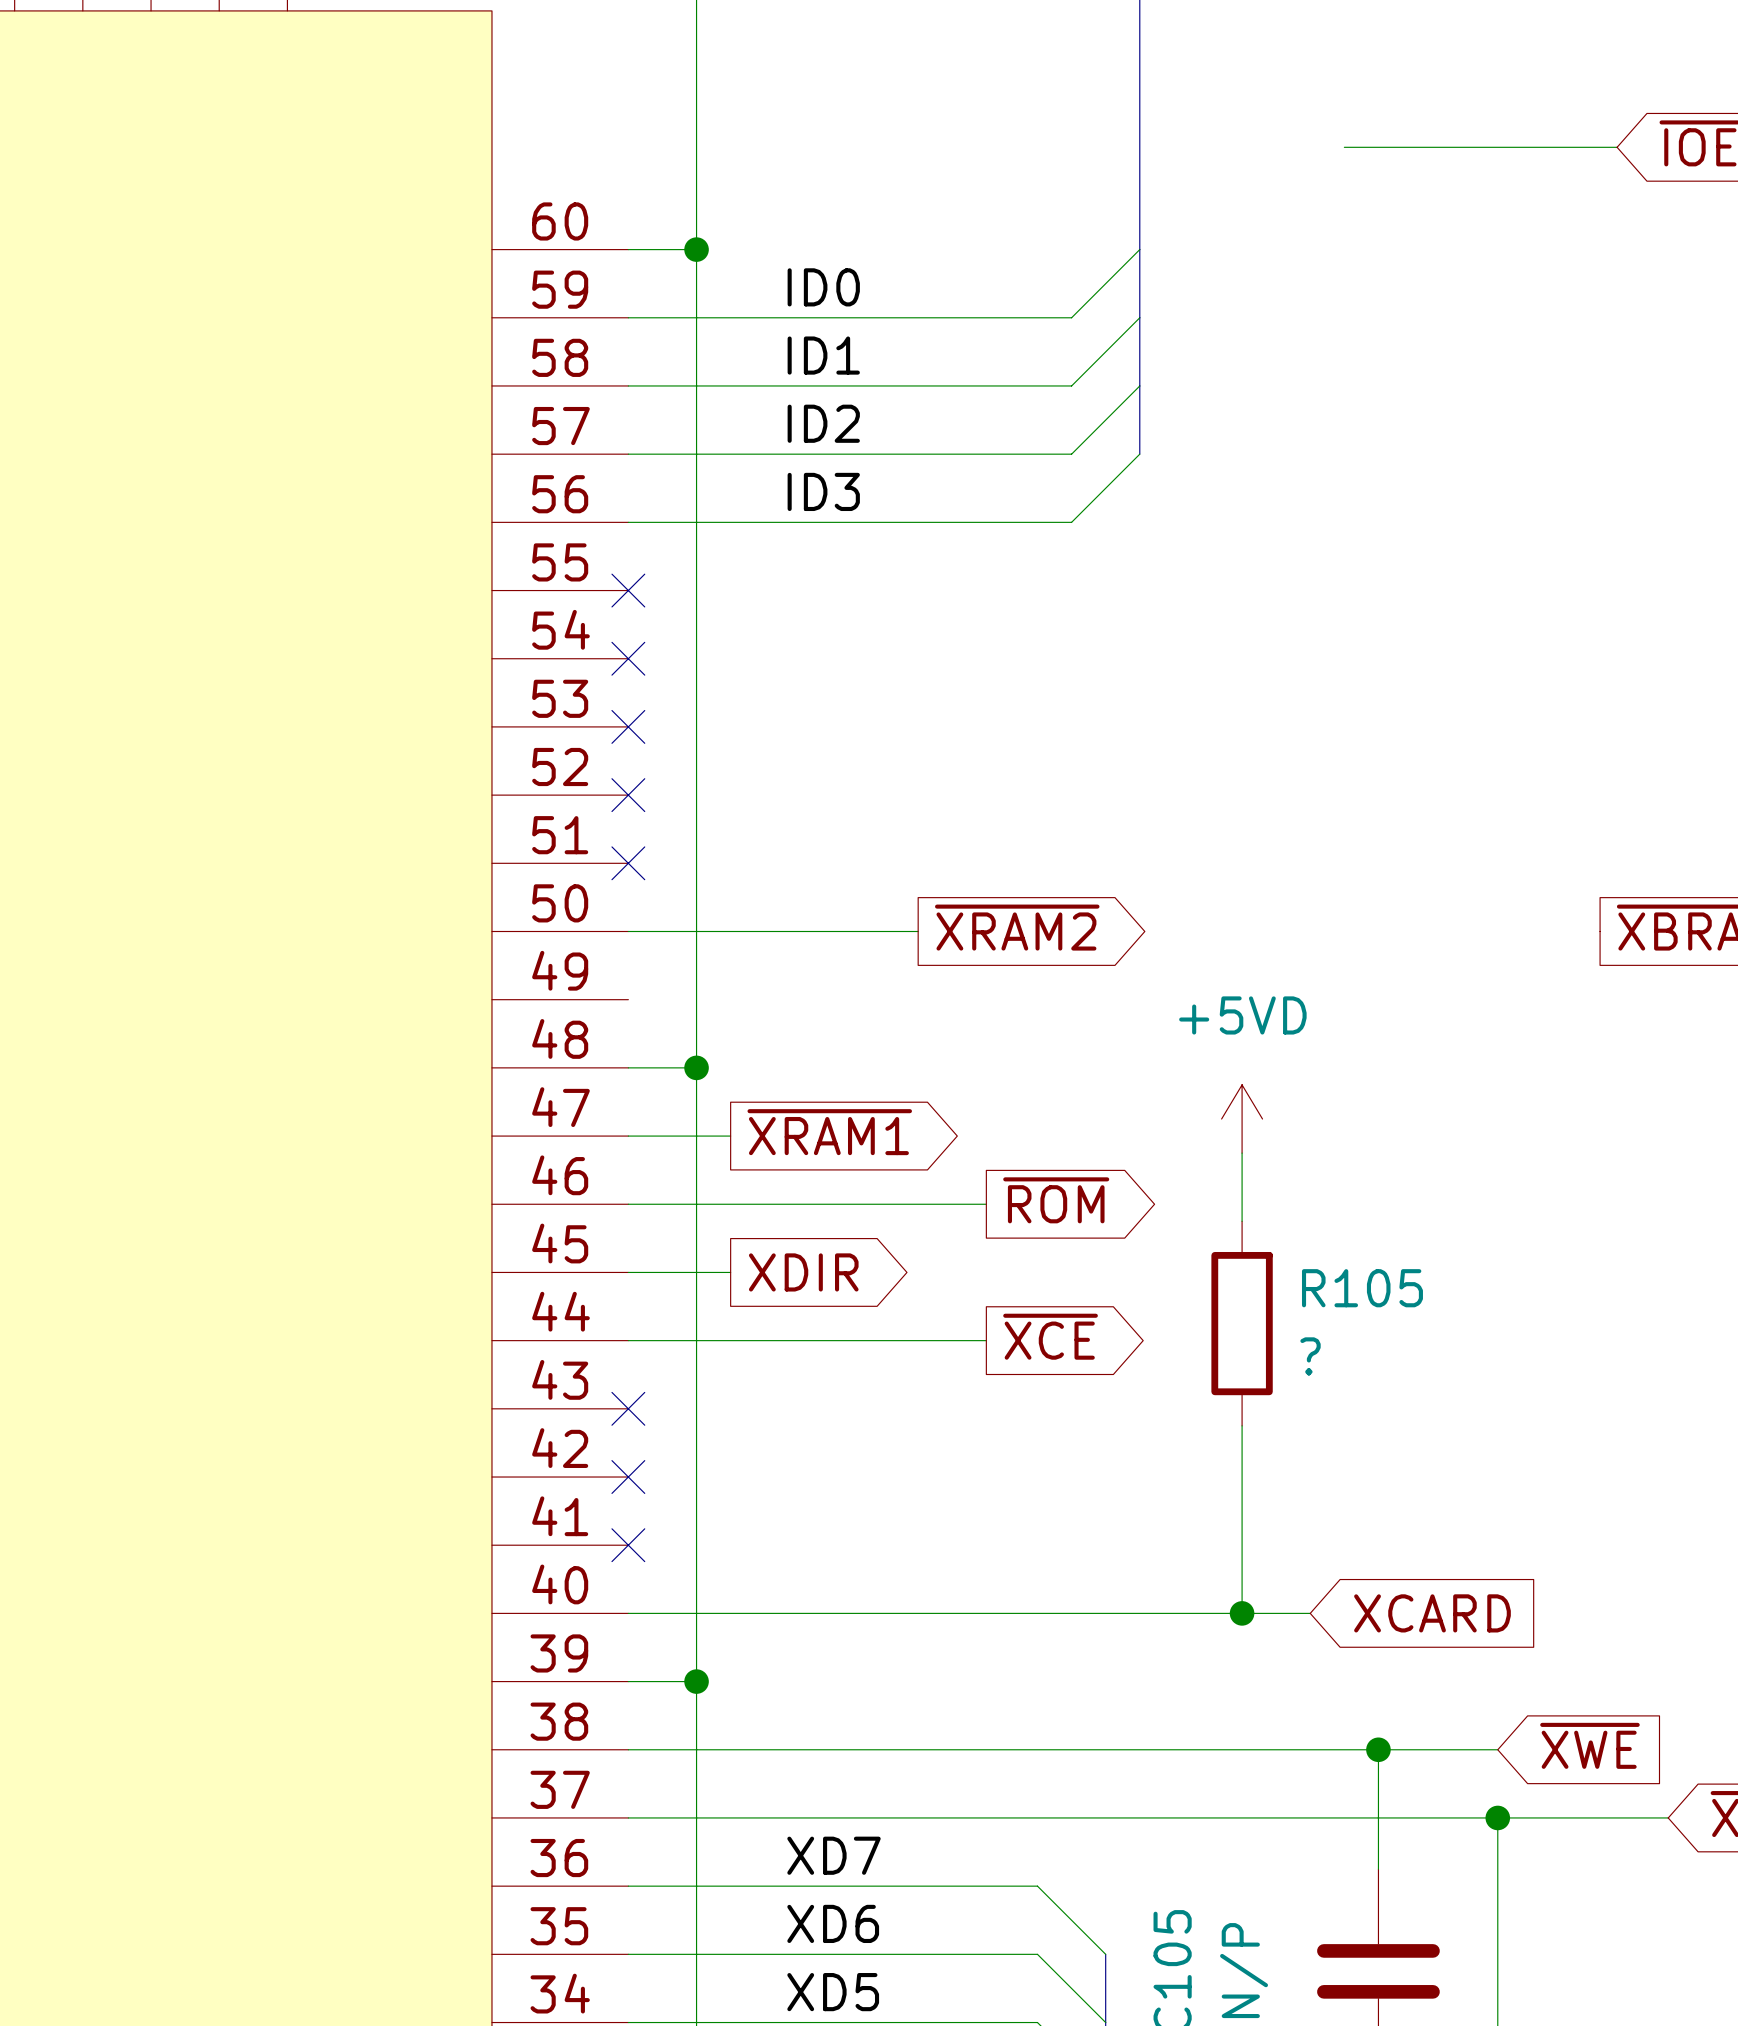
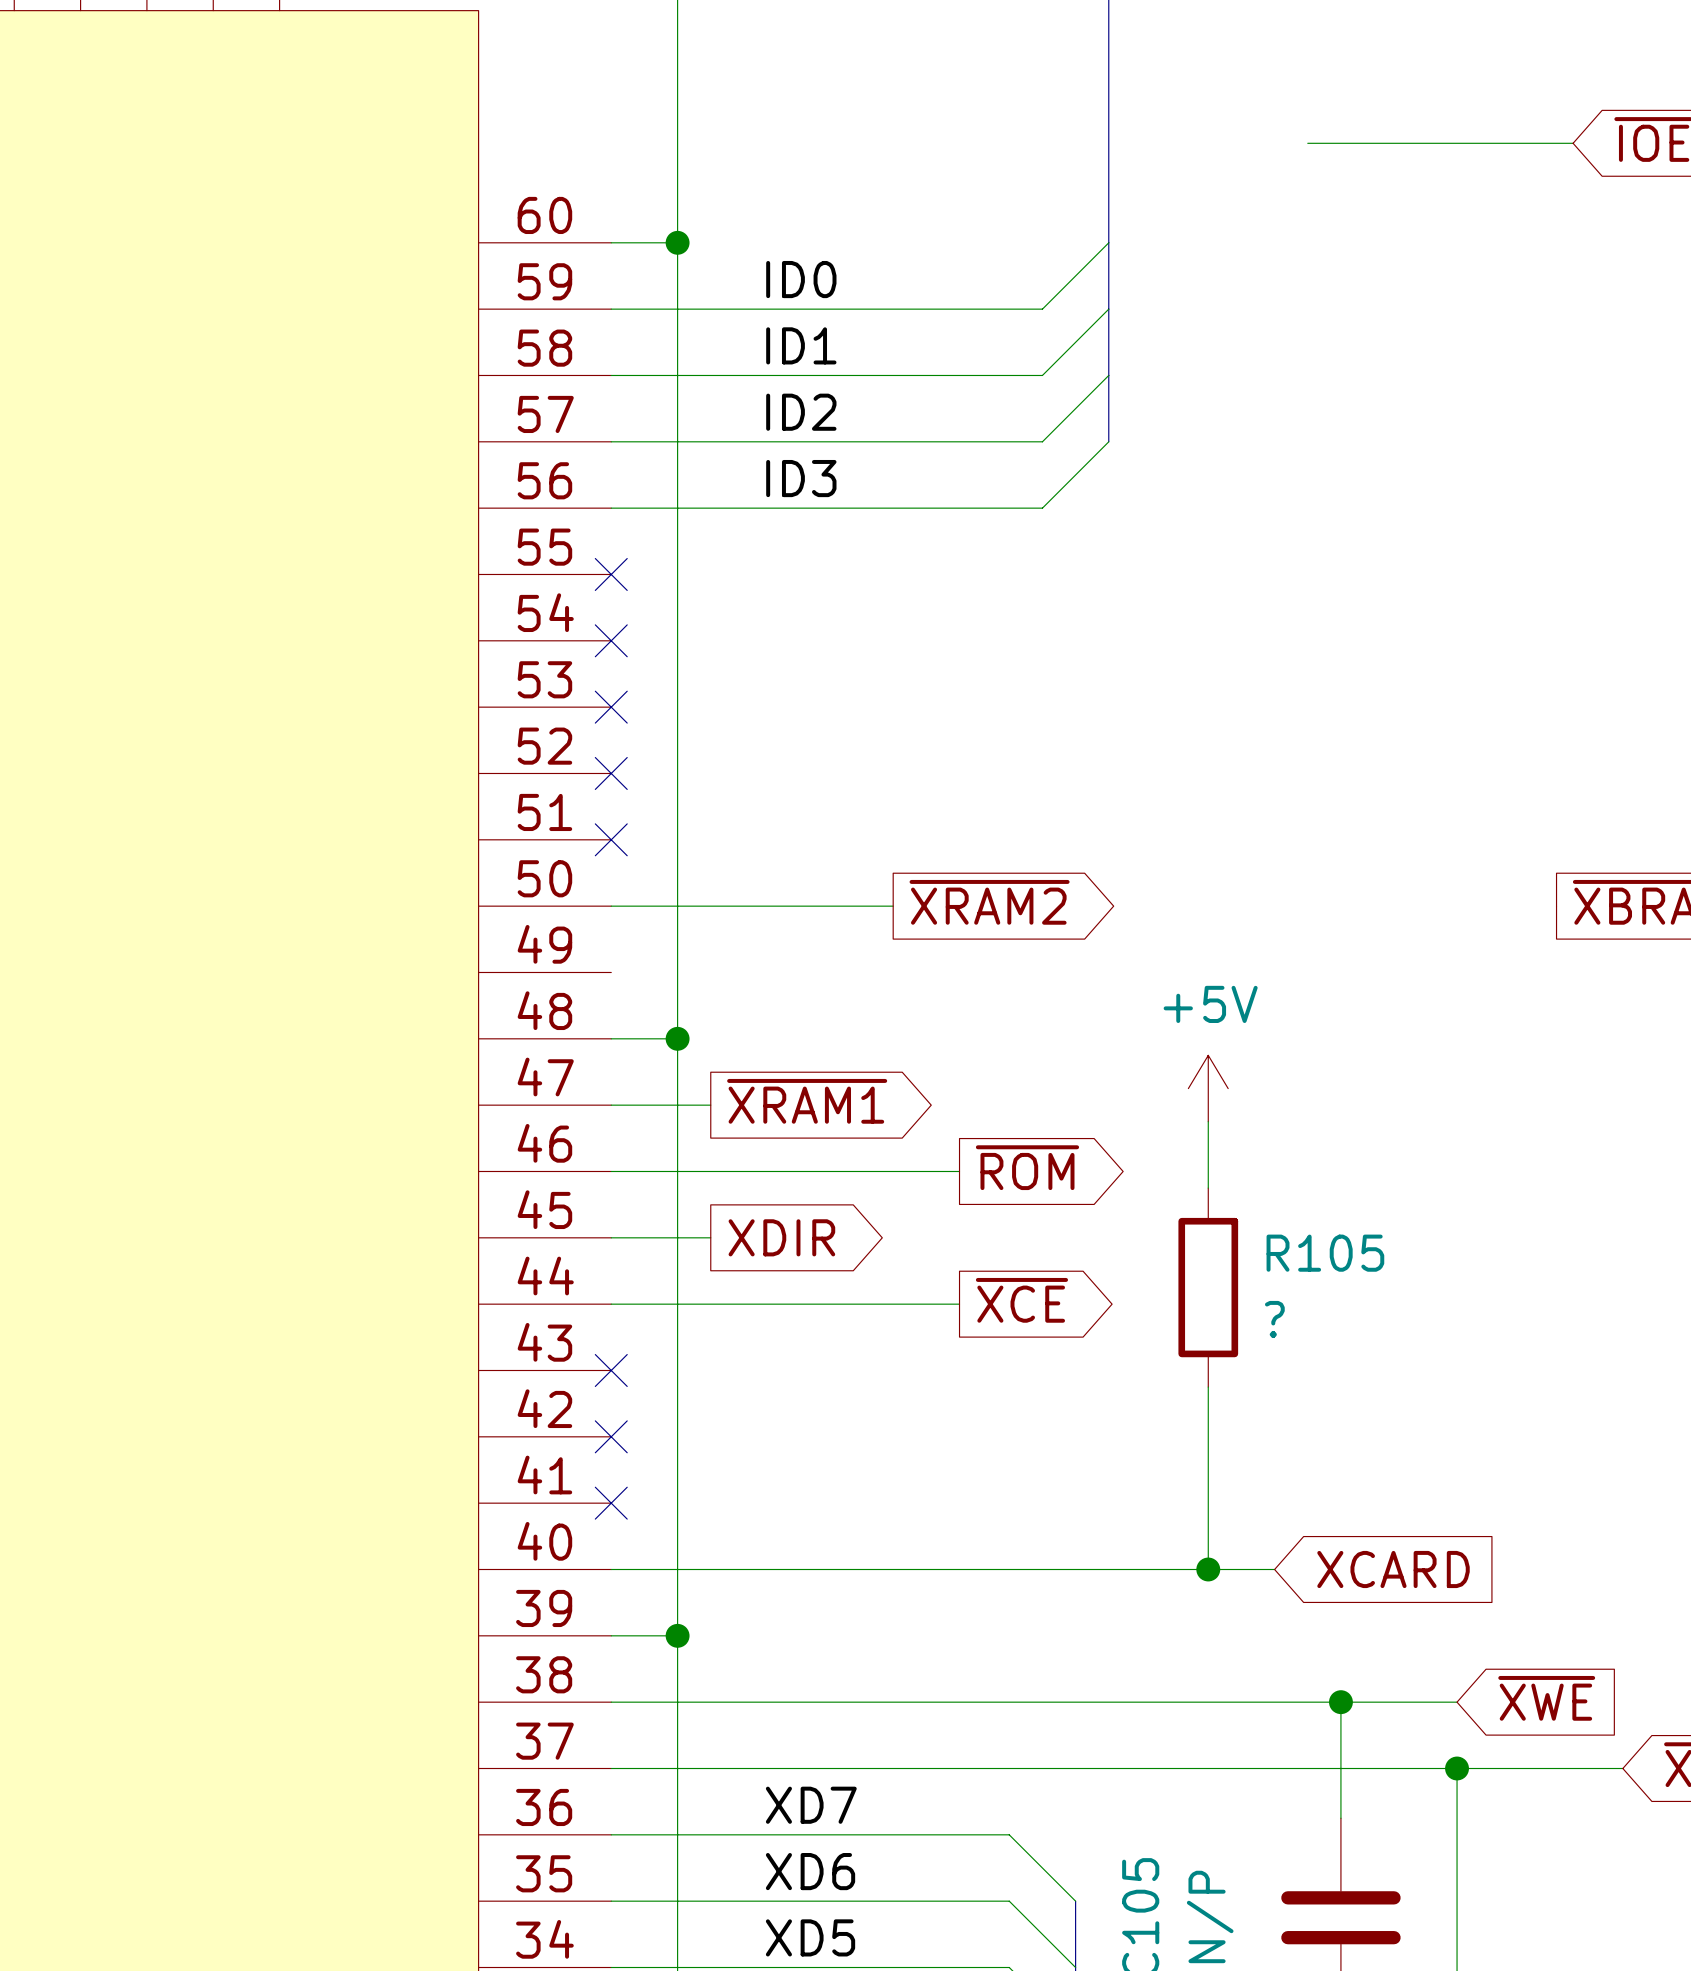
power symbol: +5VD (1242, 1119) -> +5V (1208, 1088)

